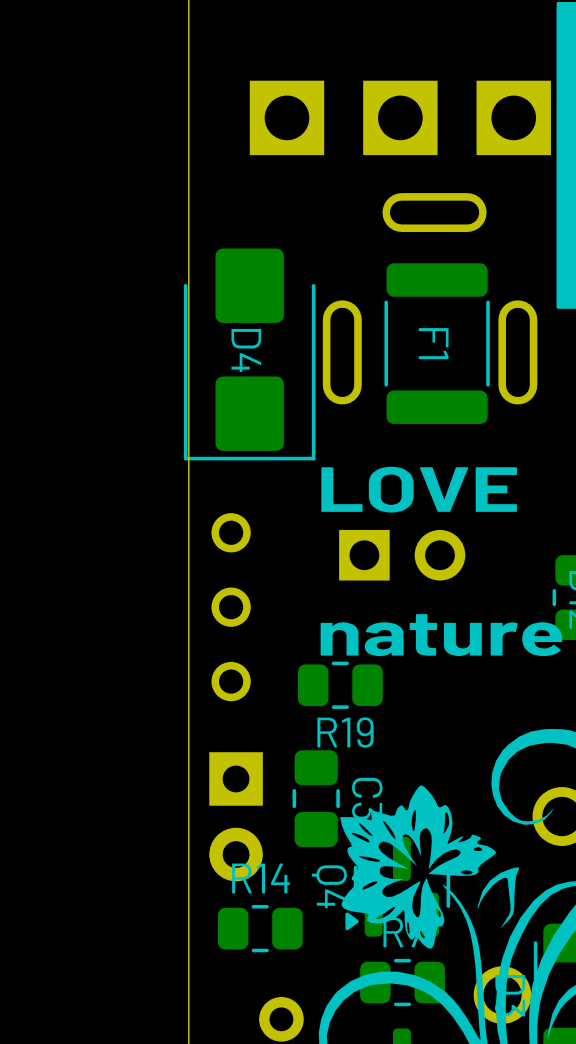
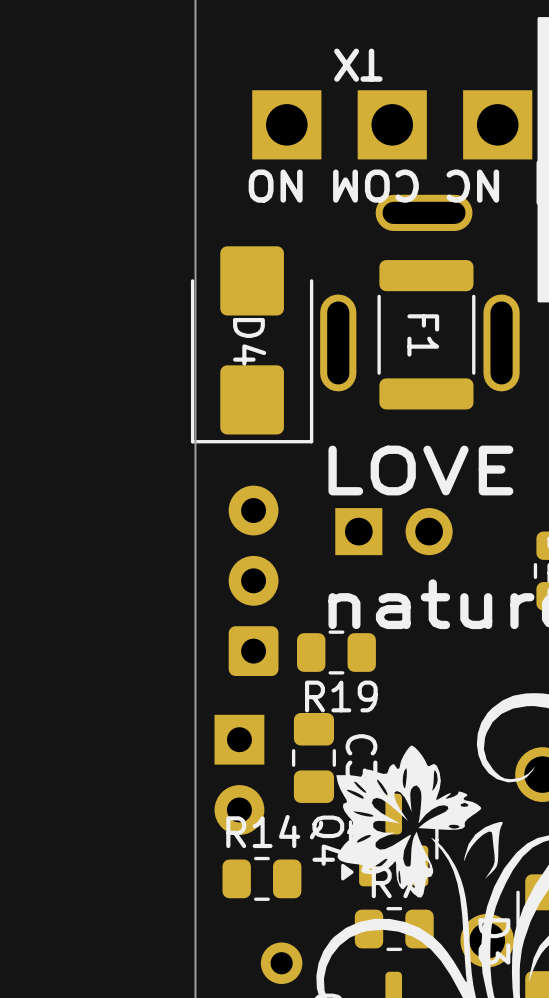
part footprint: [211, 513, 251, 702] -> [228, 485, 279, 677]

